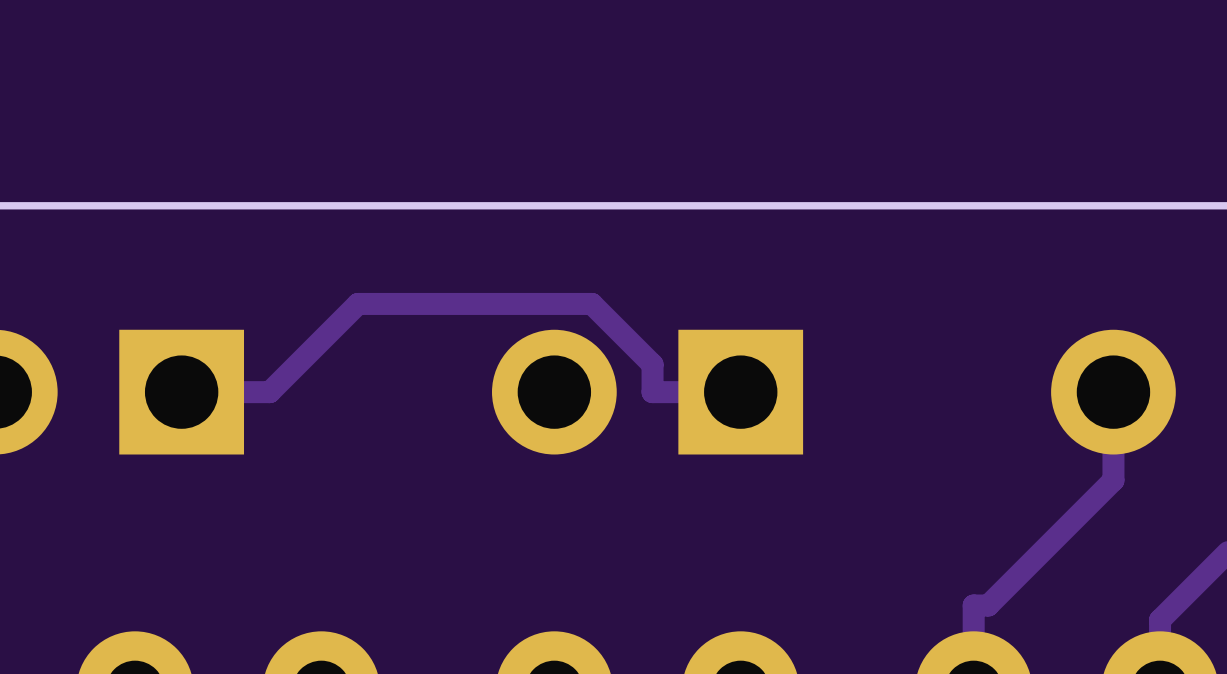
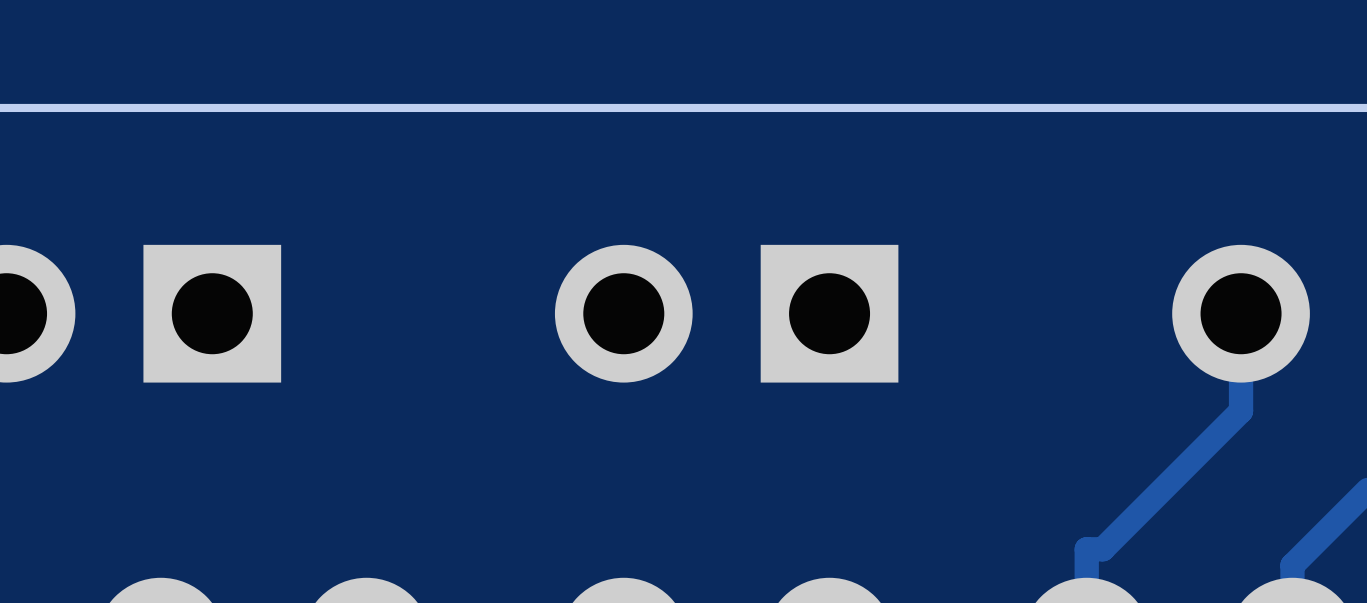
track: (740, 392) (652, 392) (652, 364) (591, 303) (358, 303) (269, 392) (181, 392) -> none

